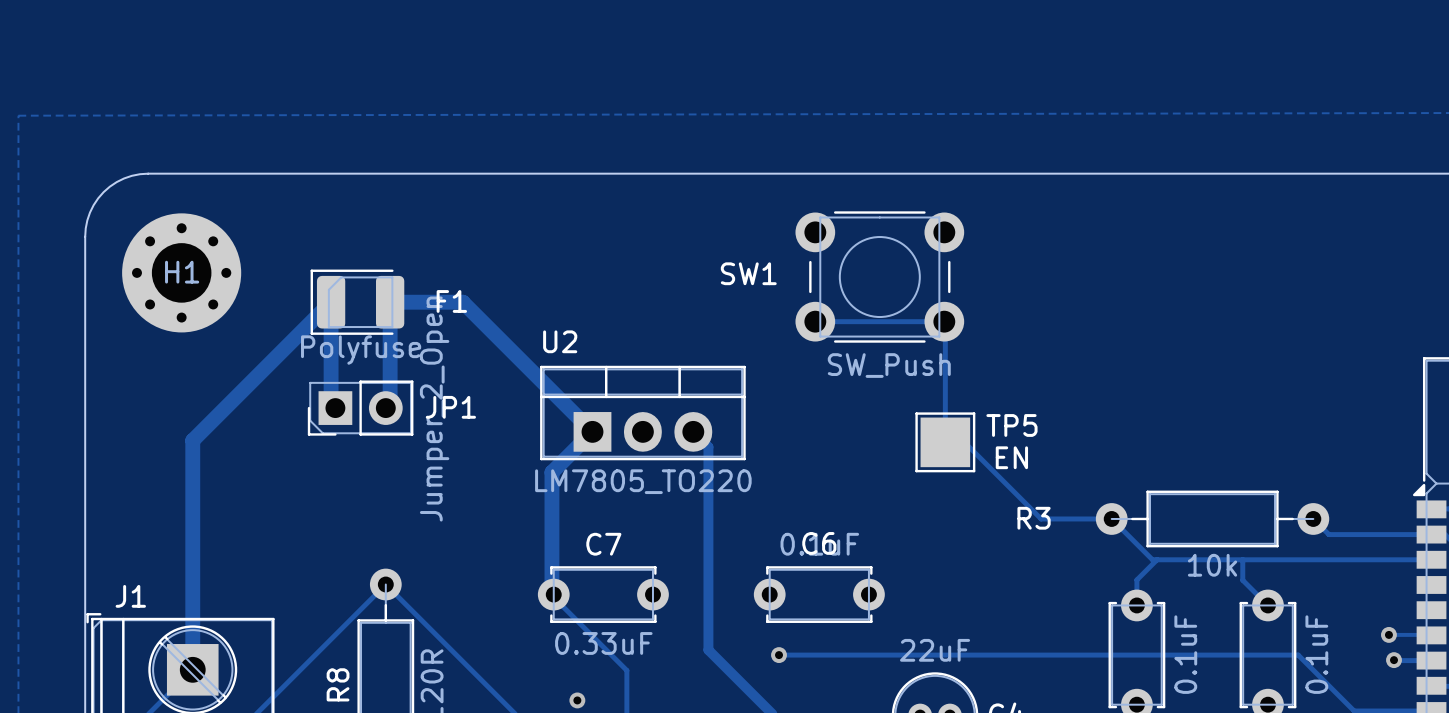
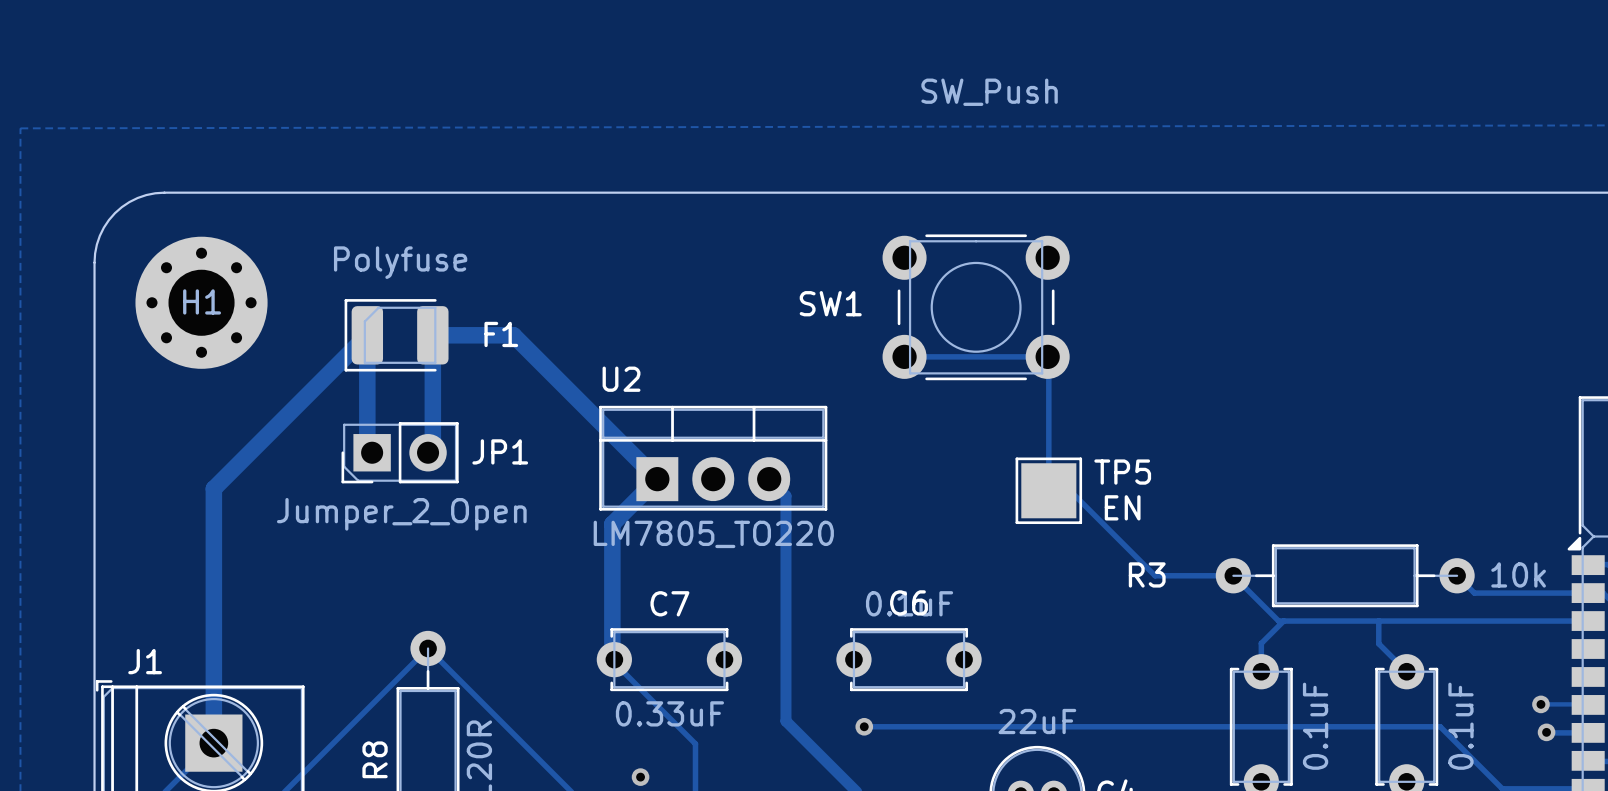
F1 value position: Polyfuse (361, 350) -> Polyfuse (400, 262)
SW1 value position: SW_Push (889, 365) -> SW_Push (989, 92)
JP1 value rotation: 0° (434, 409) -> 90° clockwise (401, 514)
R3 value position: 10k (1212, 565) -> 10k (1518, 574)

